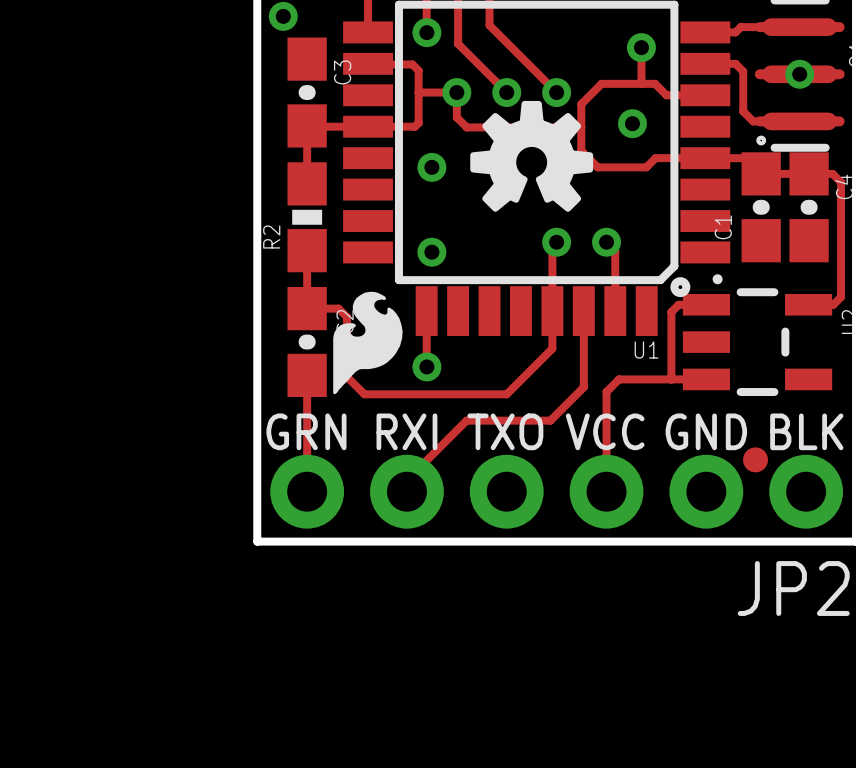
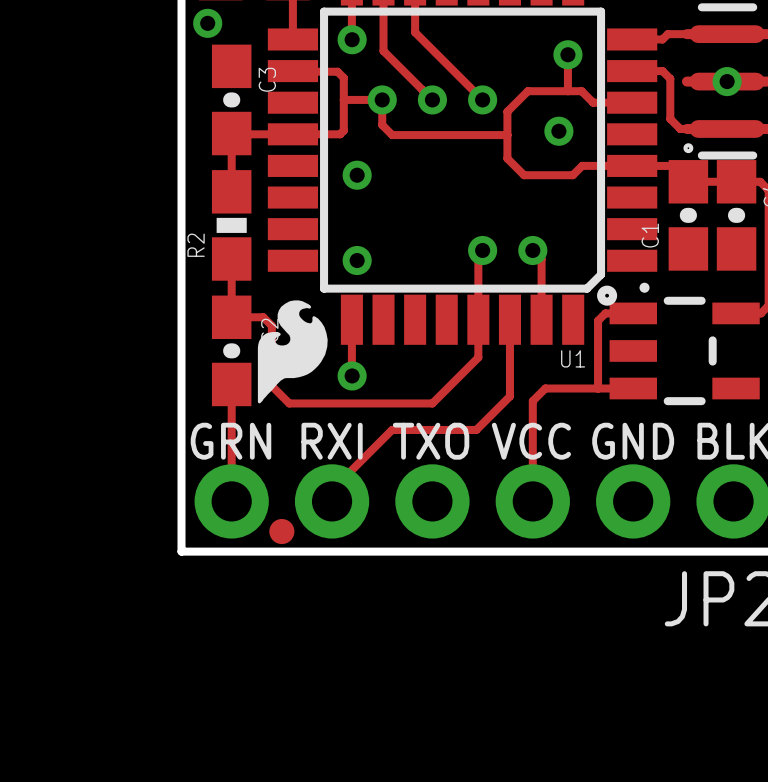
drawing: [470, 100, 594, 212] -> none
part position: (755, 459) -> (281, 531)

